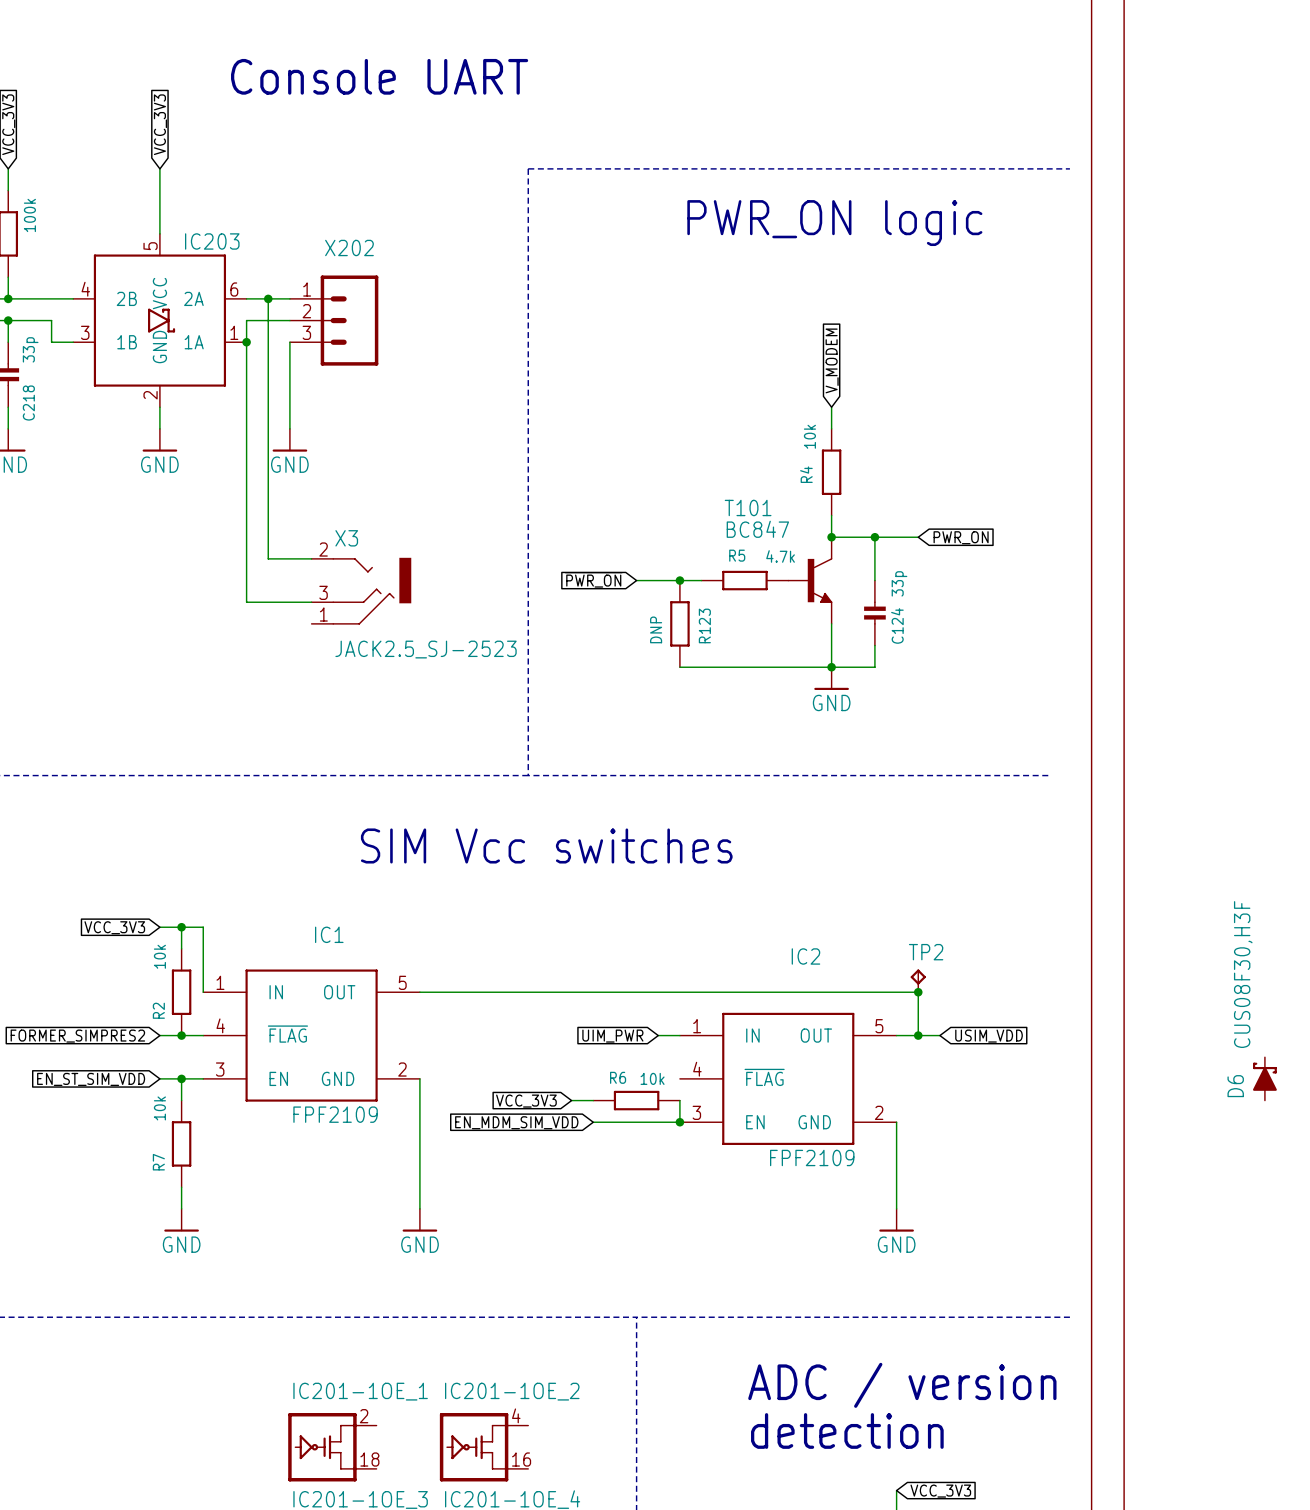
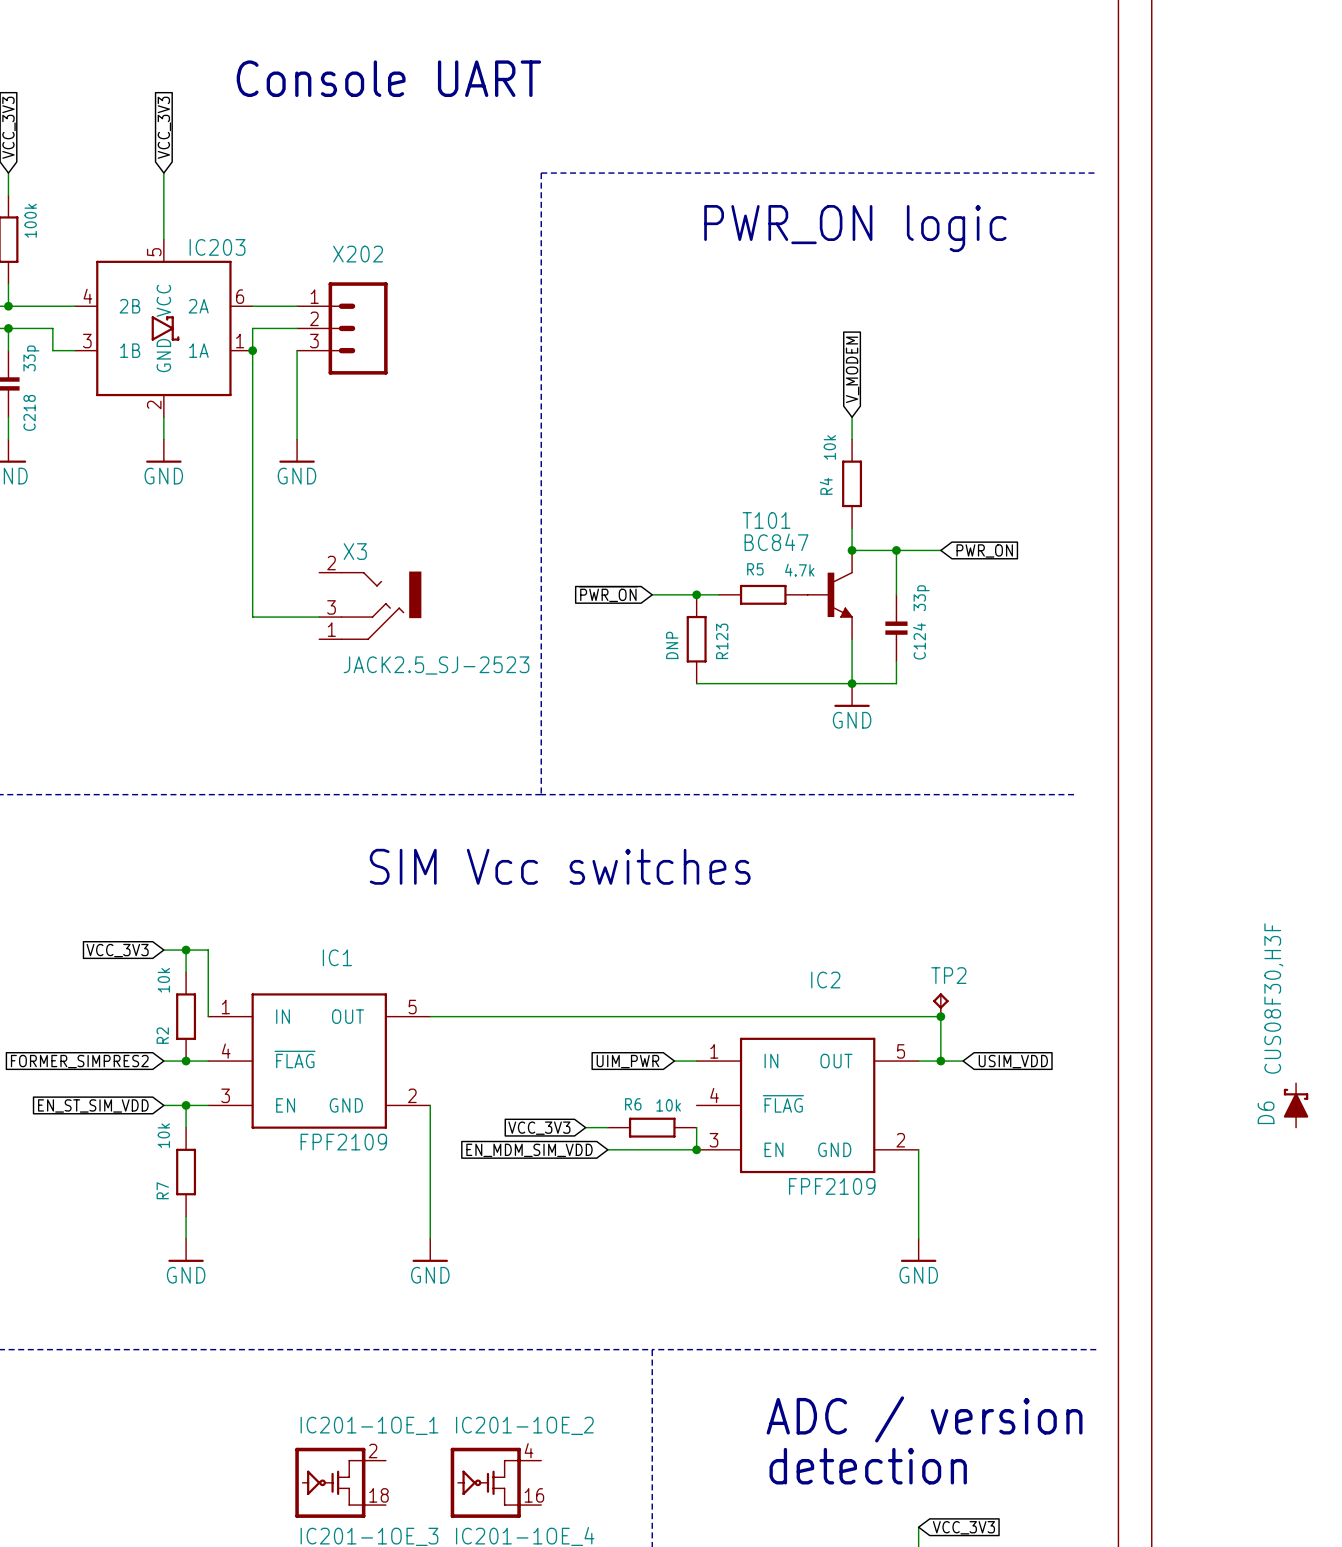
wire: (268, 298) (268, 558) (311, 558) -> none
junction: (268, 298) -> none

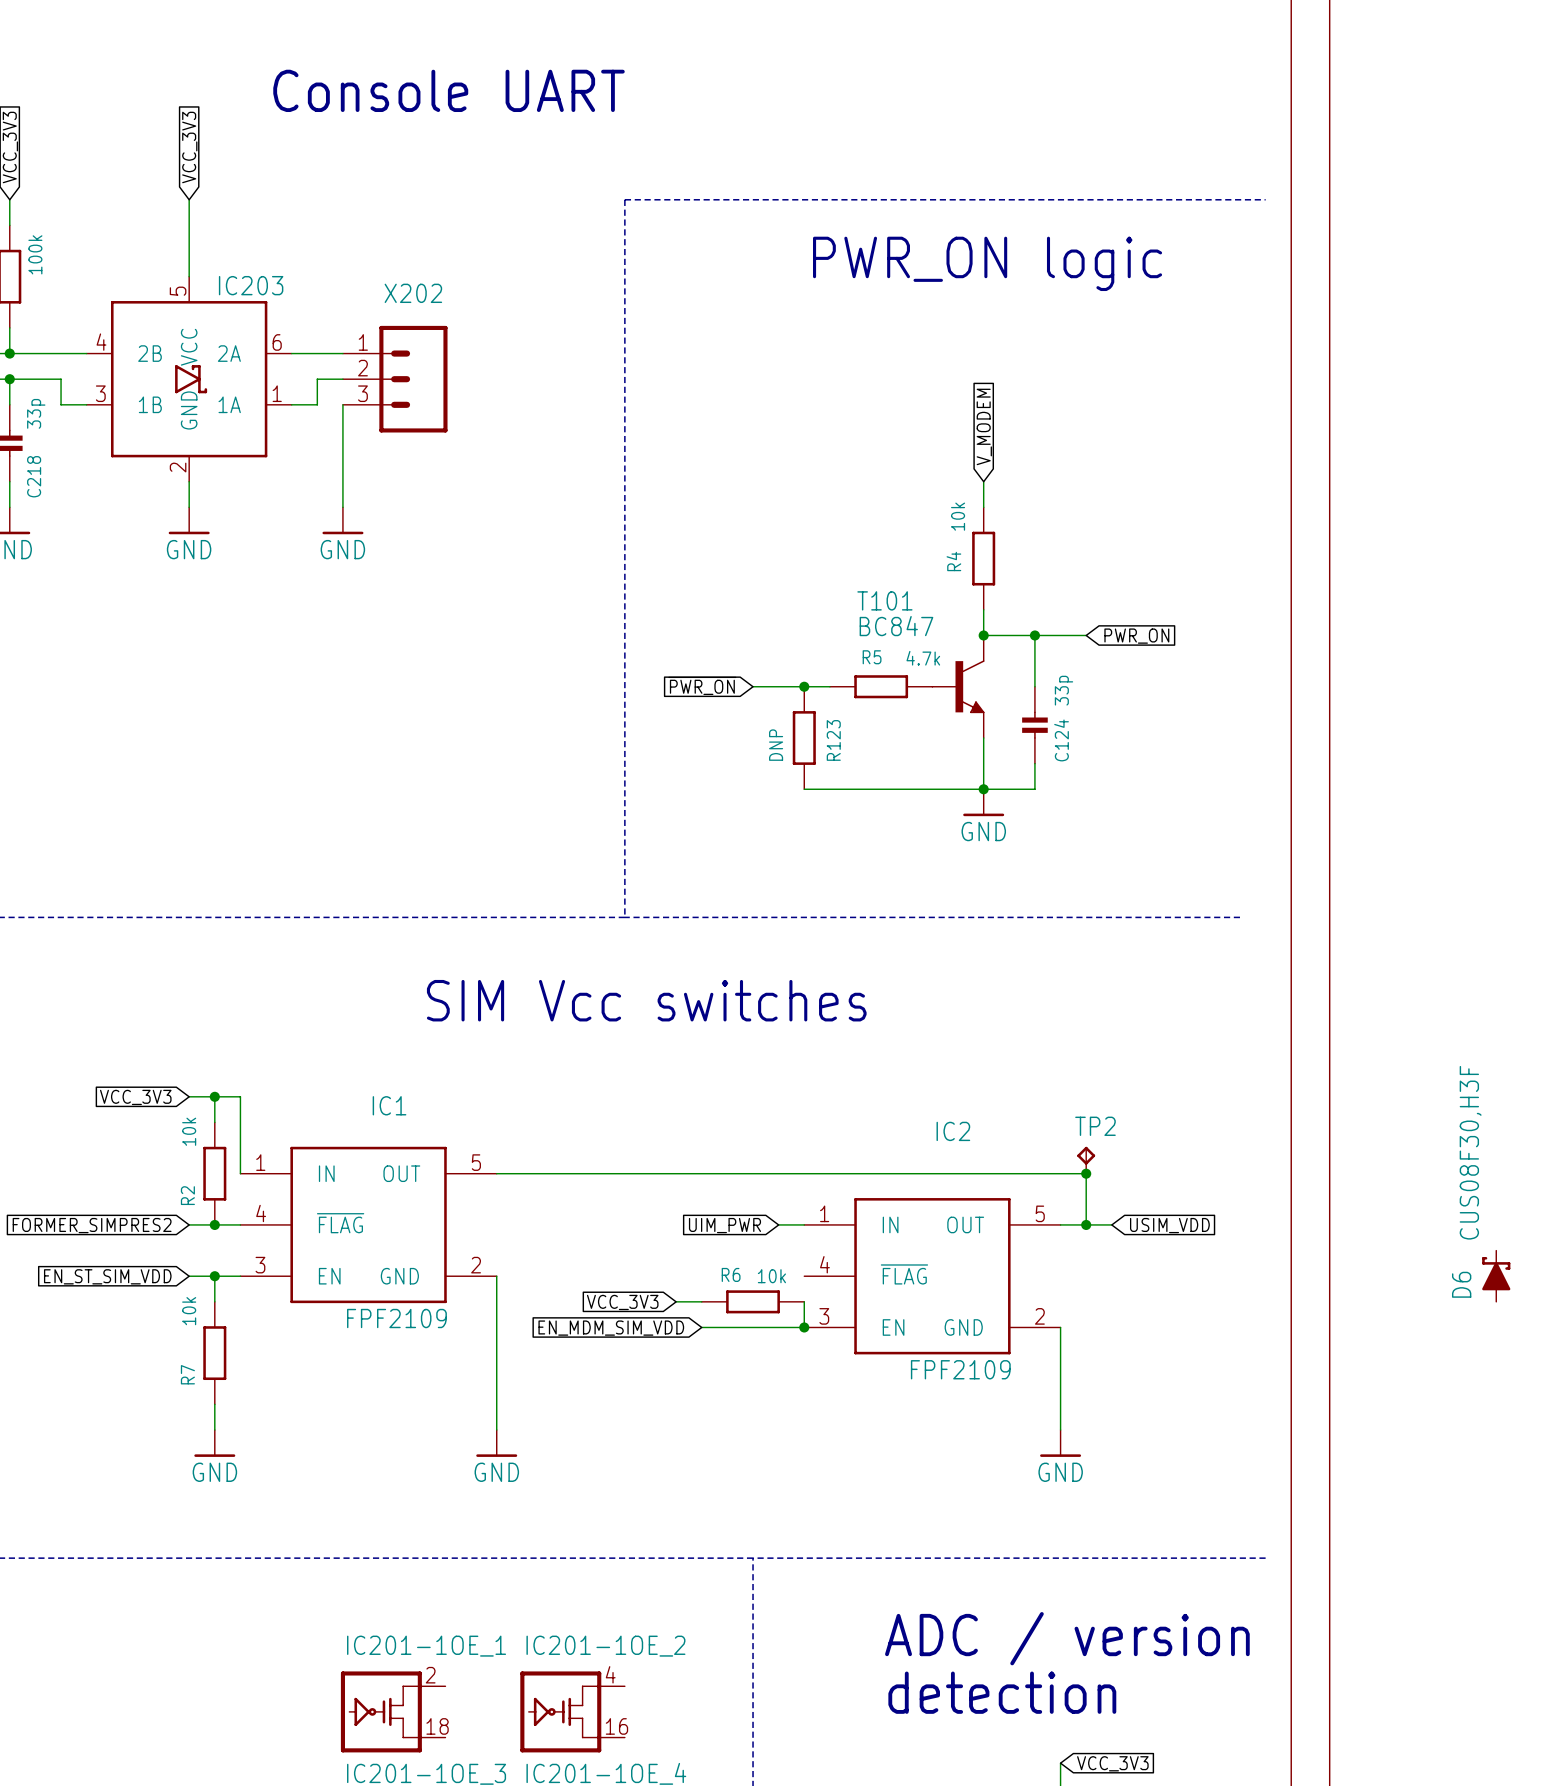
wire: (274, 328) (252, 328) (252, 617) (319, 617) -> (317, 379) (317, 404) (291, 404)
junction: (252, 350) -> none
X3: JACK2.5_SJ-2523 (370, 605) -> none

